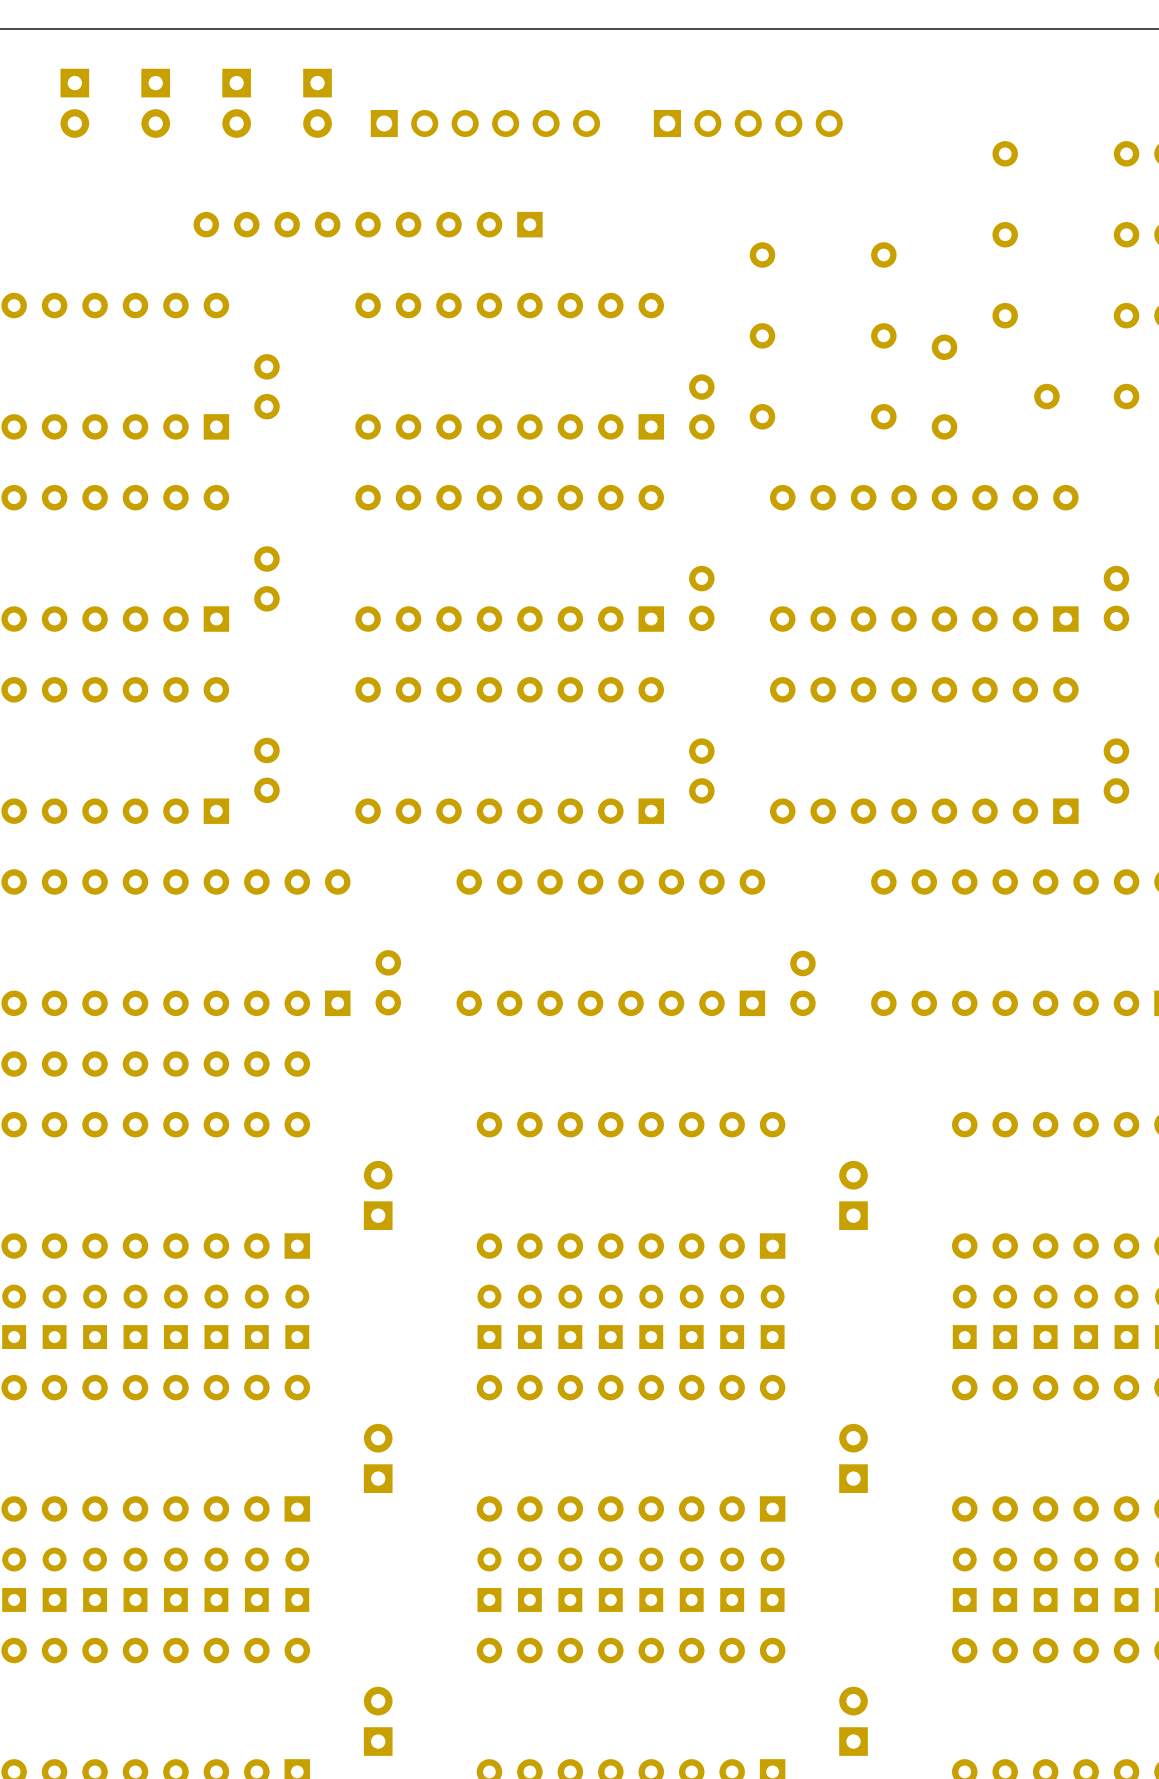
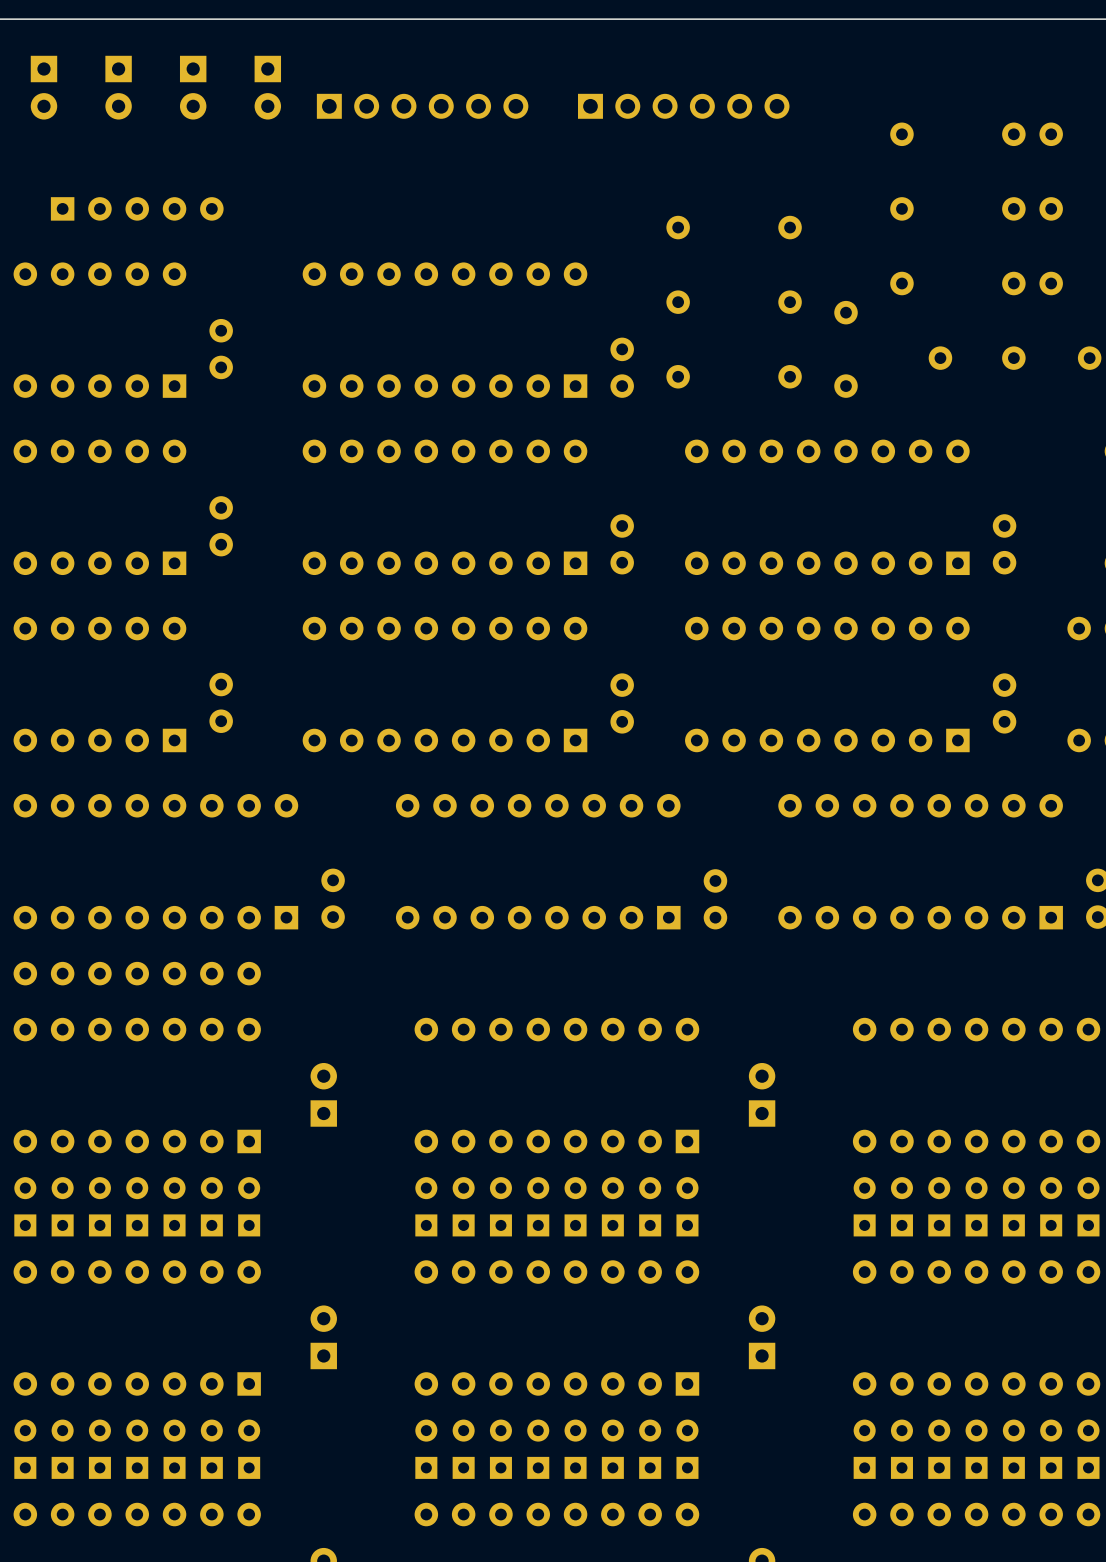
part: none -> (683, 106)
part: (368, 224) -> none
part: none -> (137, 208)

